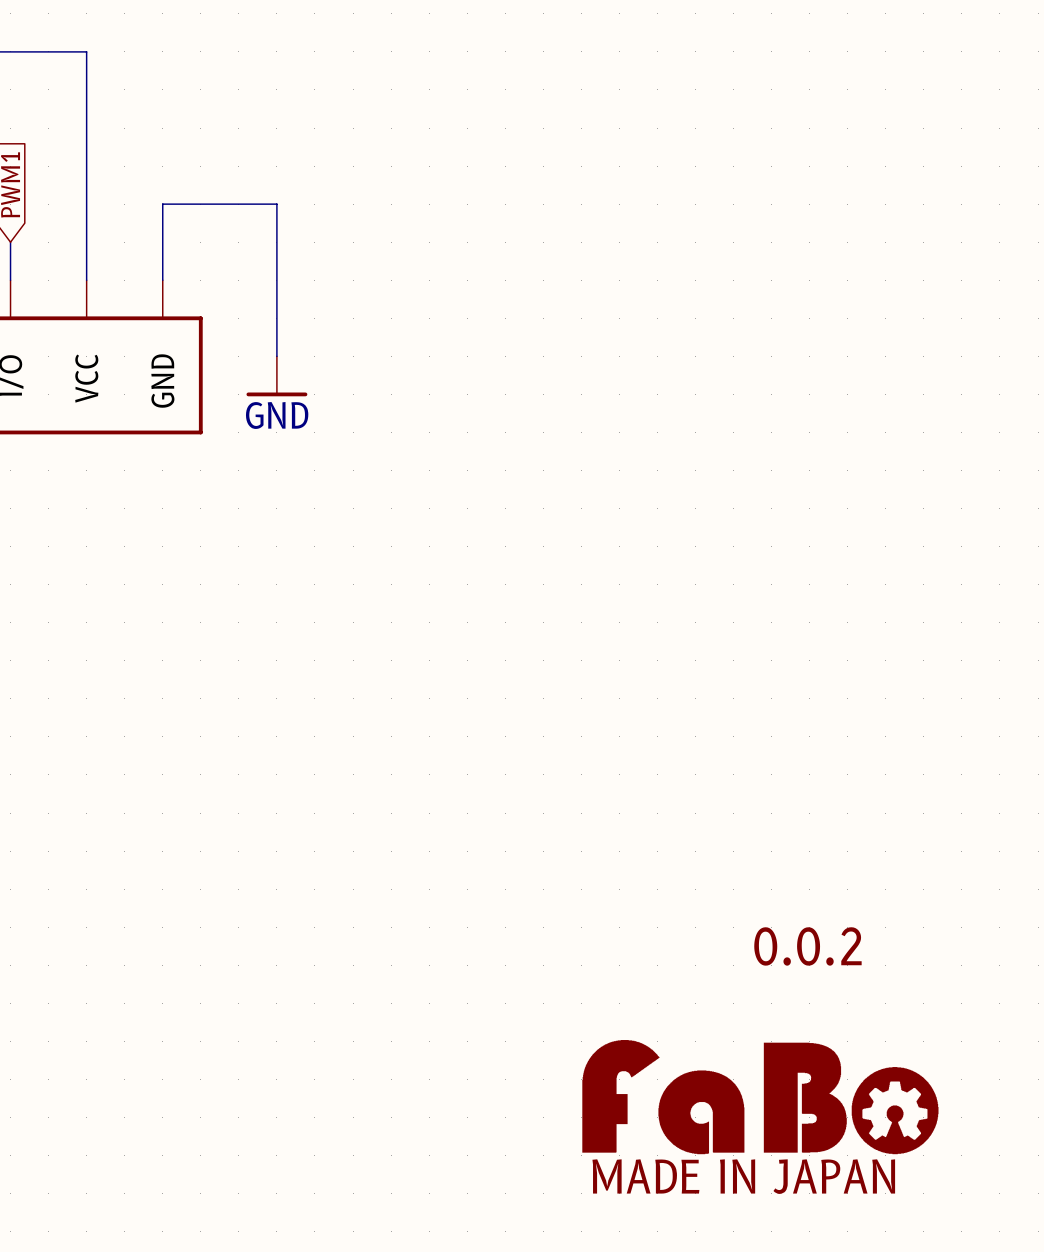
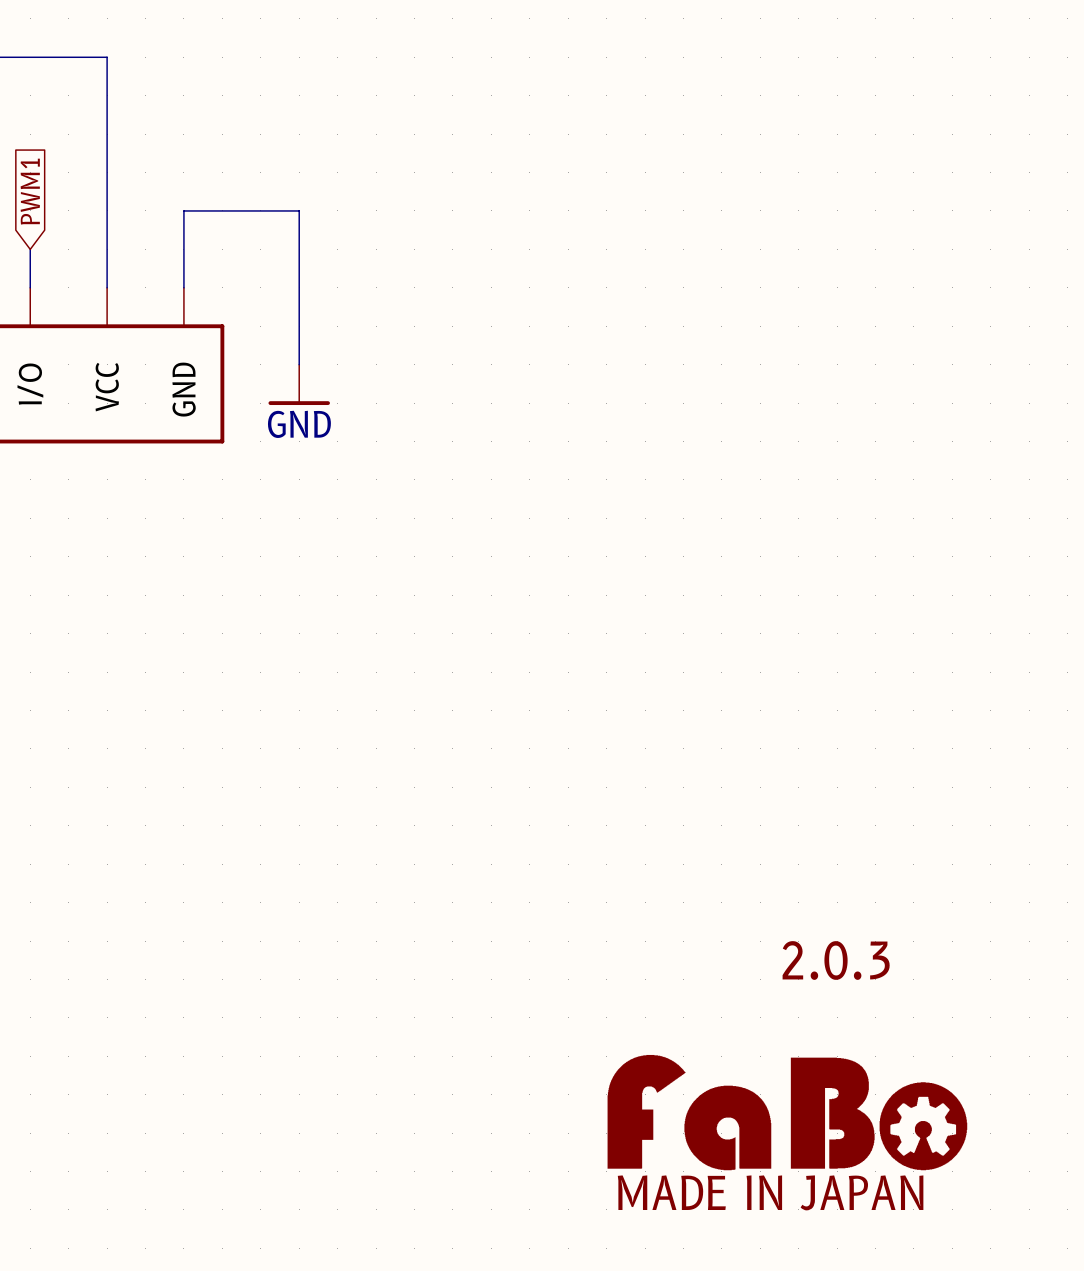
text: 0.0.2 (807, 946) -> 2.0.3 (836, 960)

